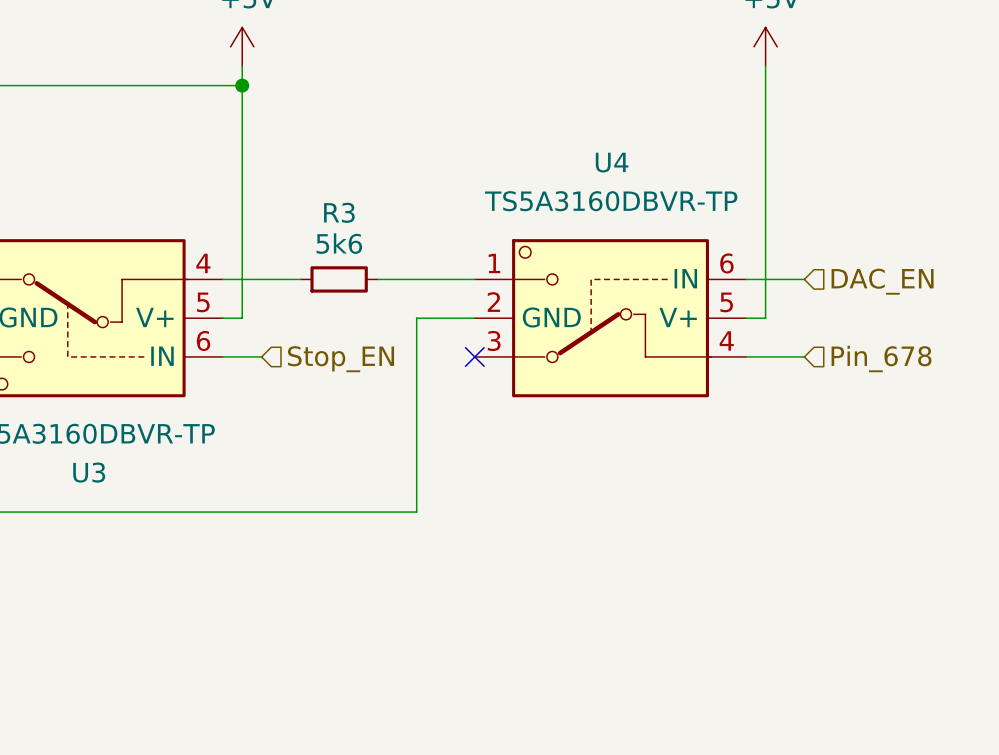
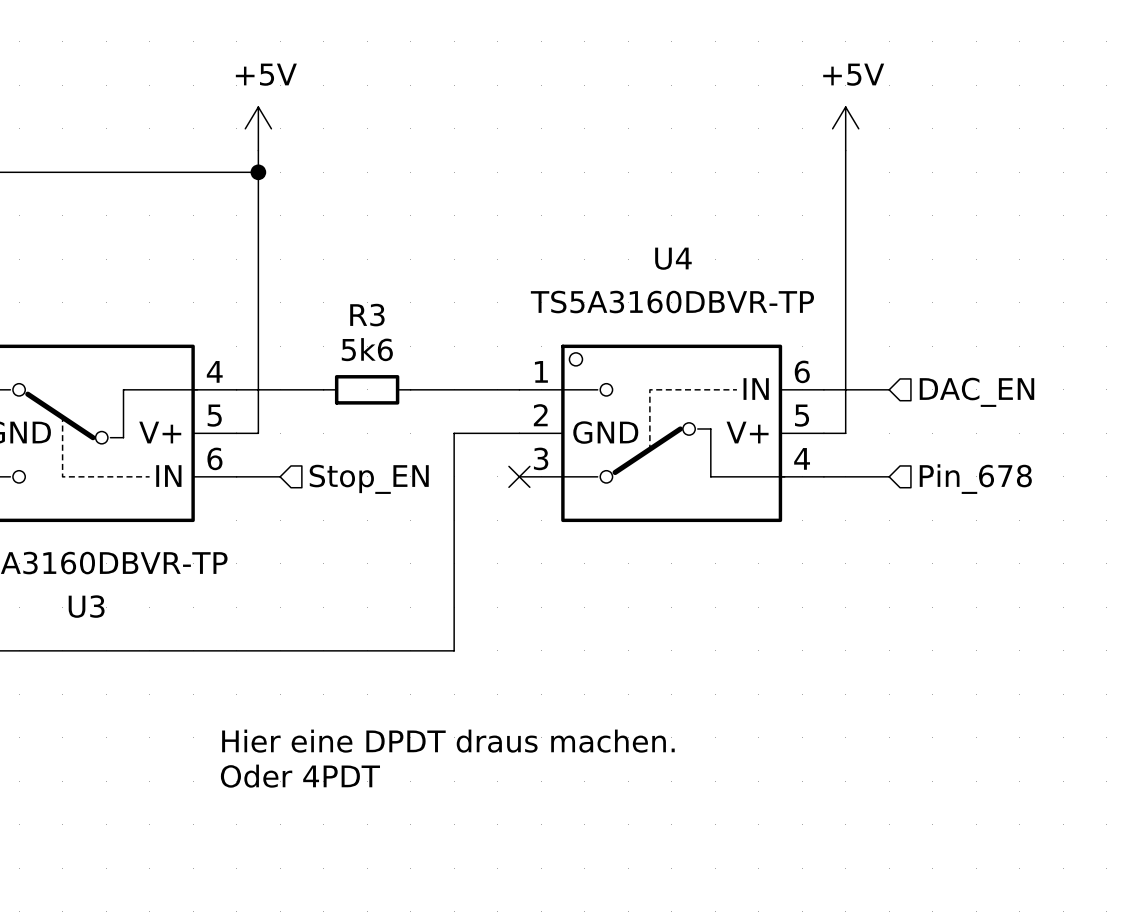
text: none -> Hier eine DPDT draus machen. (448, 741)
text: none -> Oder 4PDT (300, 776)

